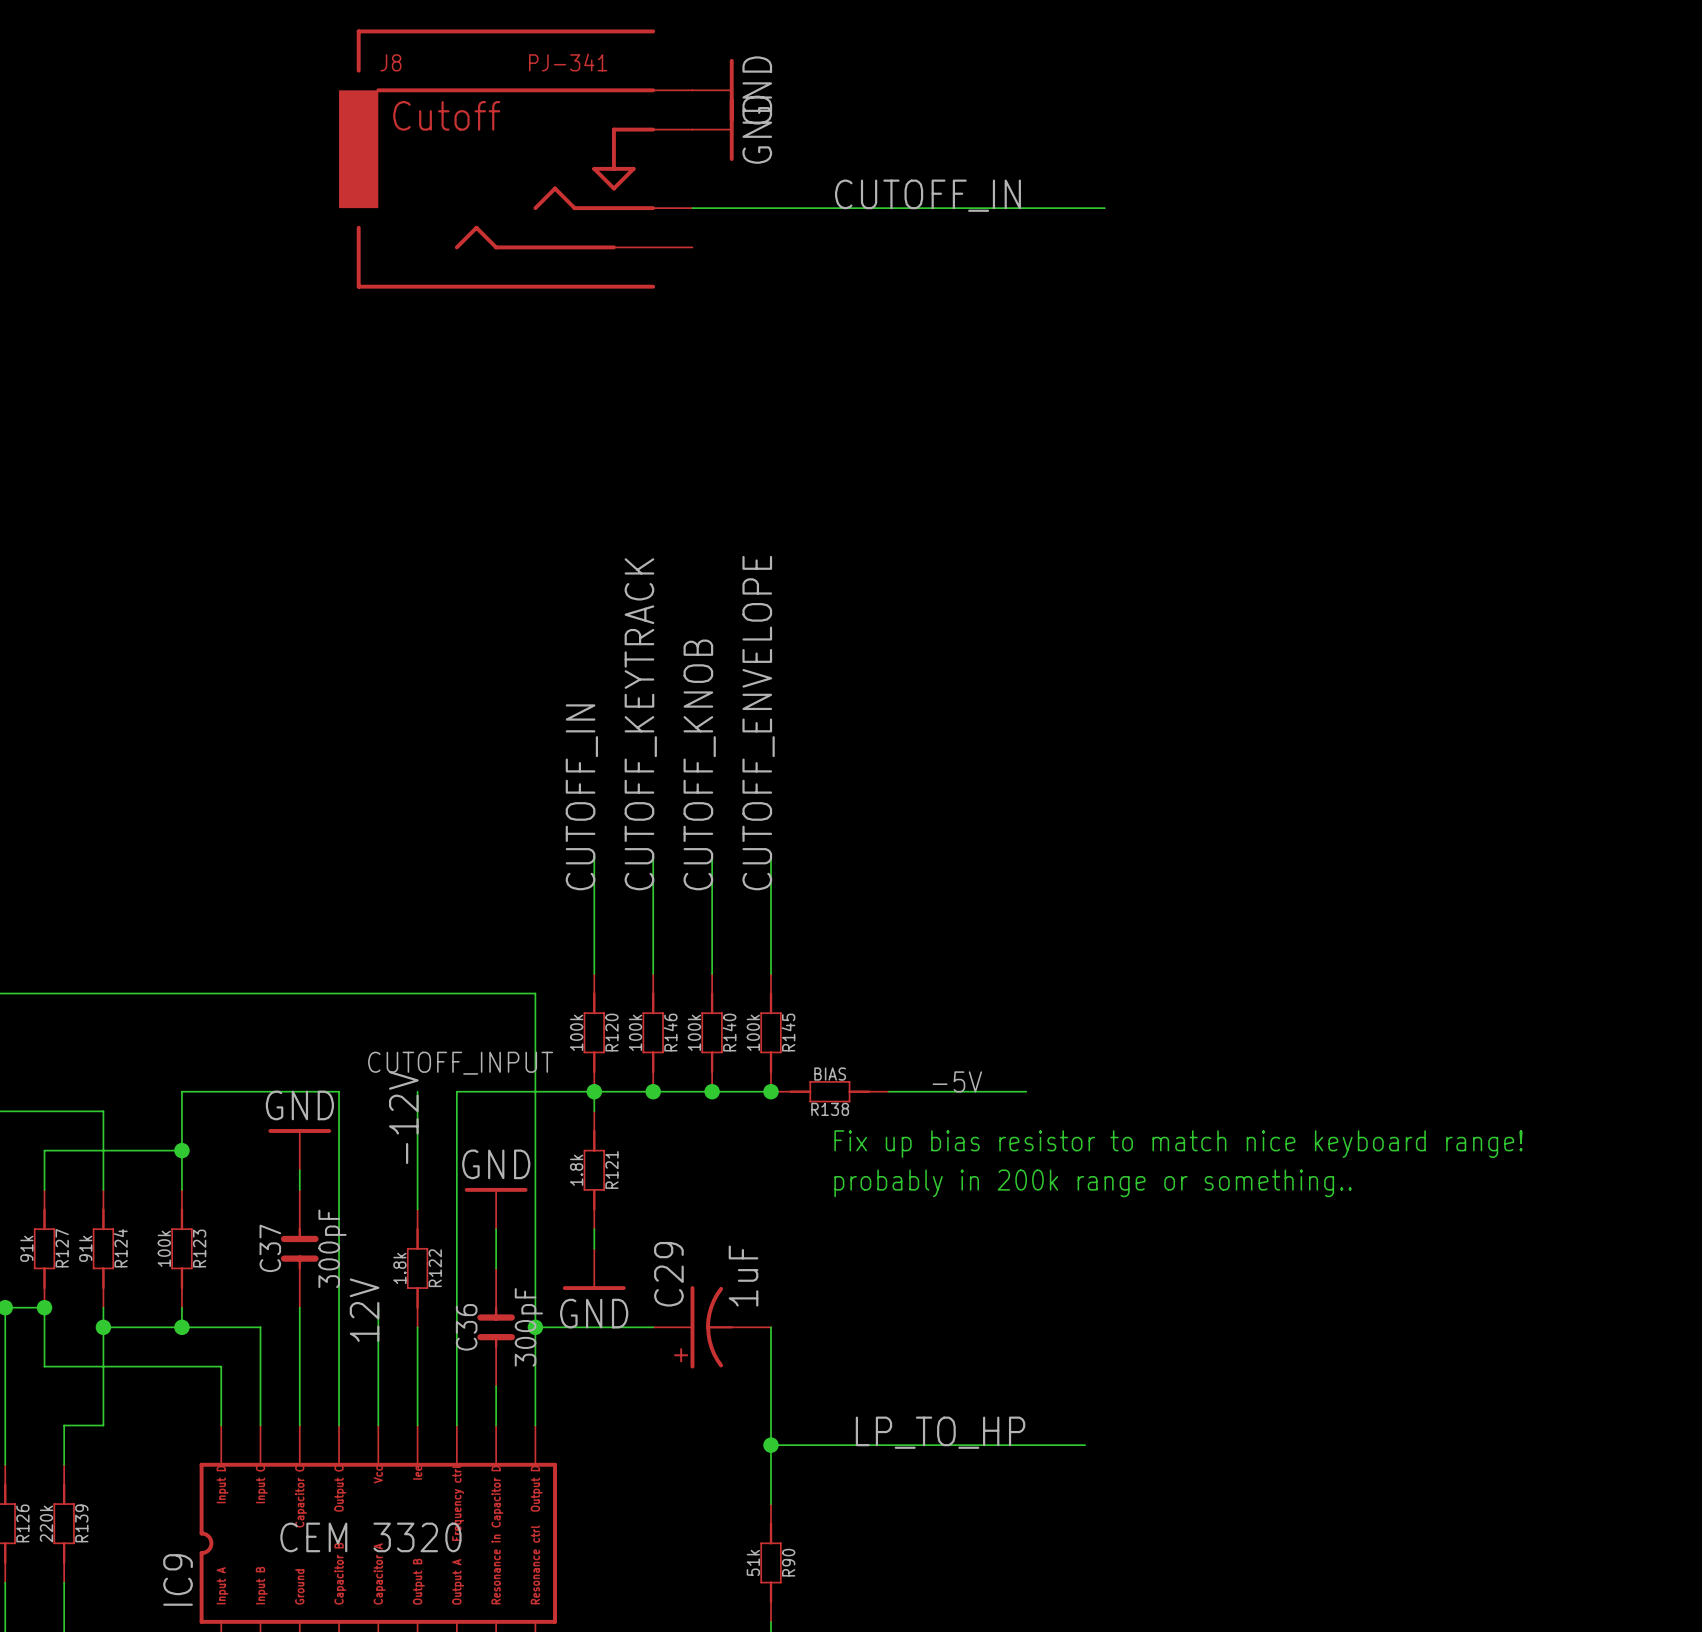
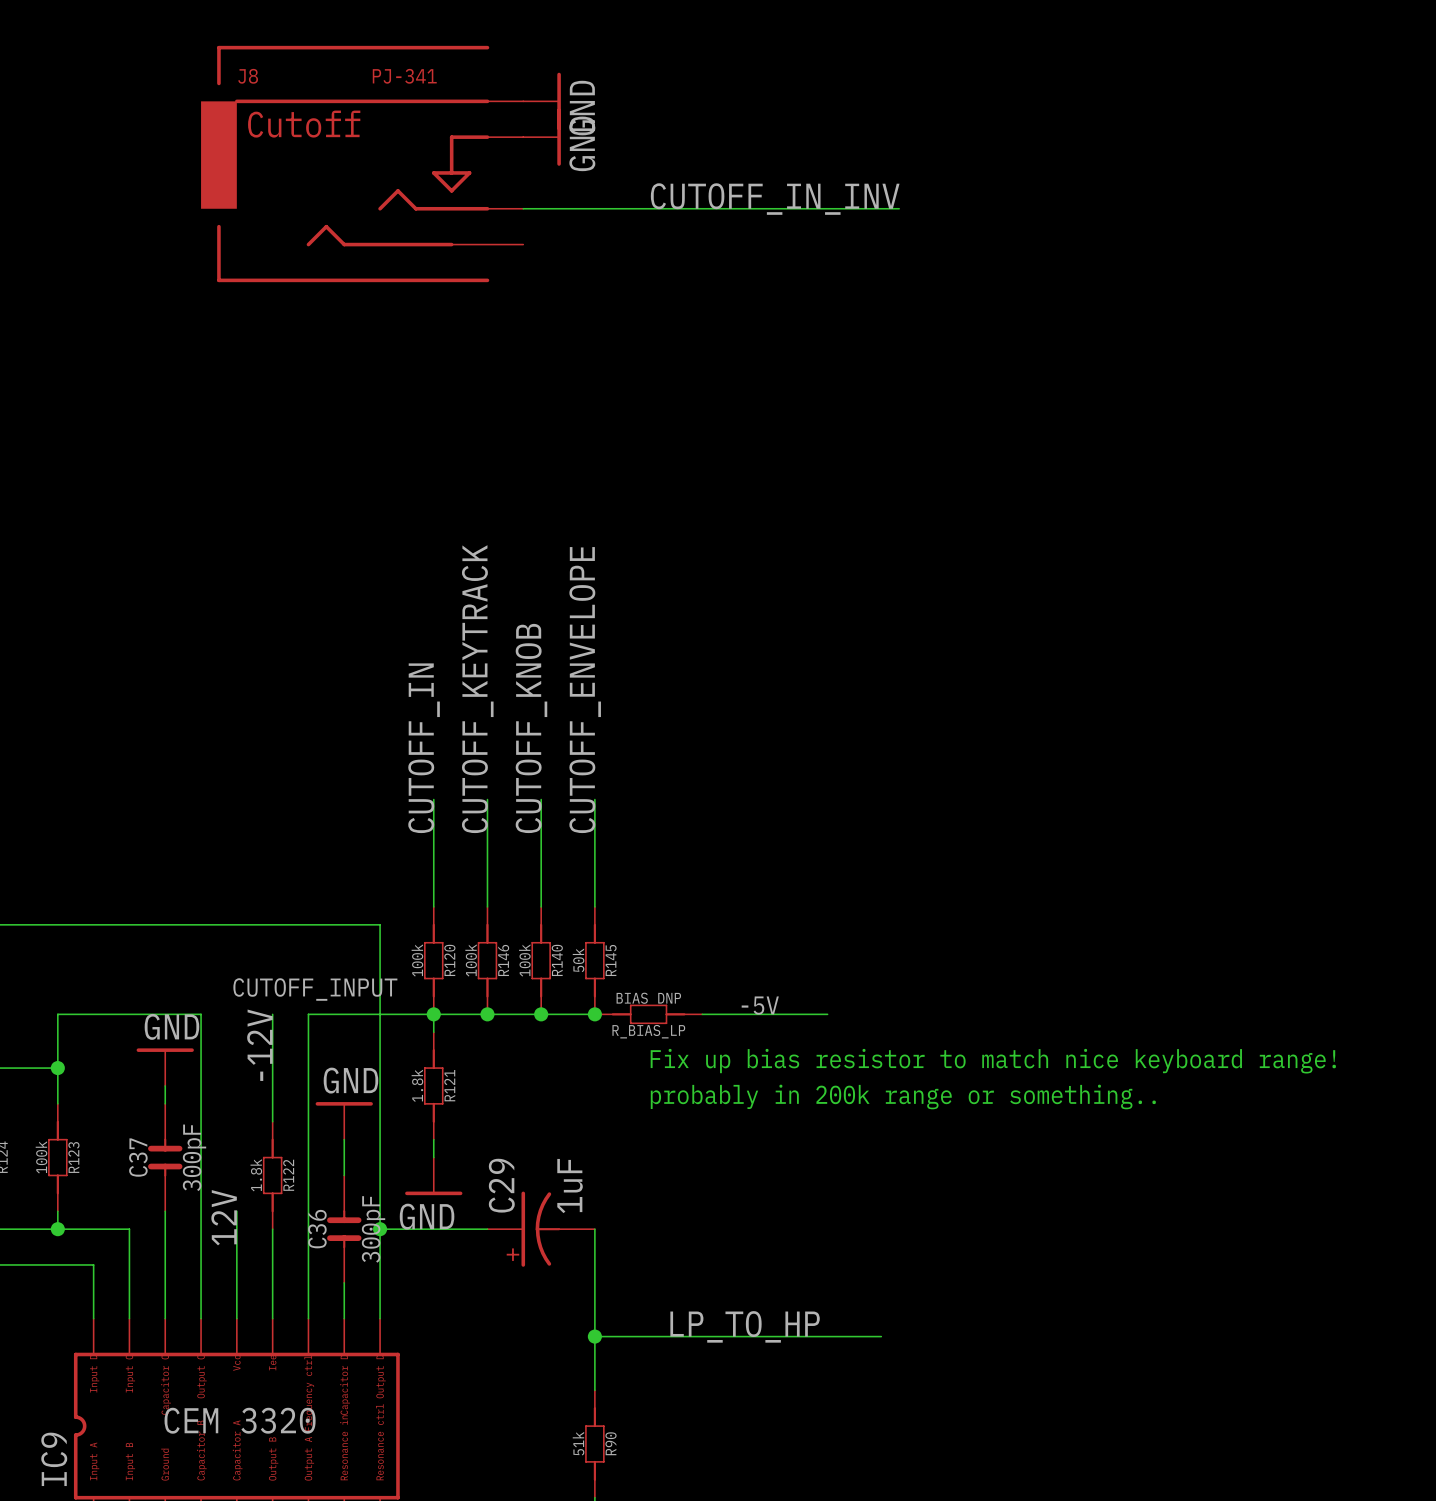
label: CUTOFF_IN (927, 195) -> CUTOFF_IN_INV (775, 199)
R145 value: 100k (753, 1032) -> 50k (578, 960)
R138 value: BIAS (830, 1074) -> BIAS DNP (648, 998)
R138 name: R138 (830, 1109) -> R_BIAS_LP (648, 1031)

